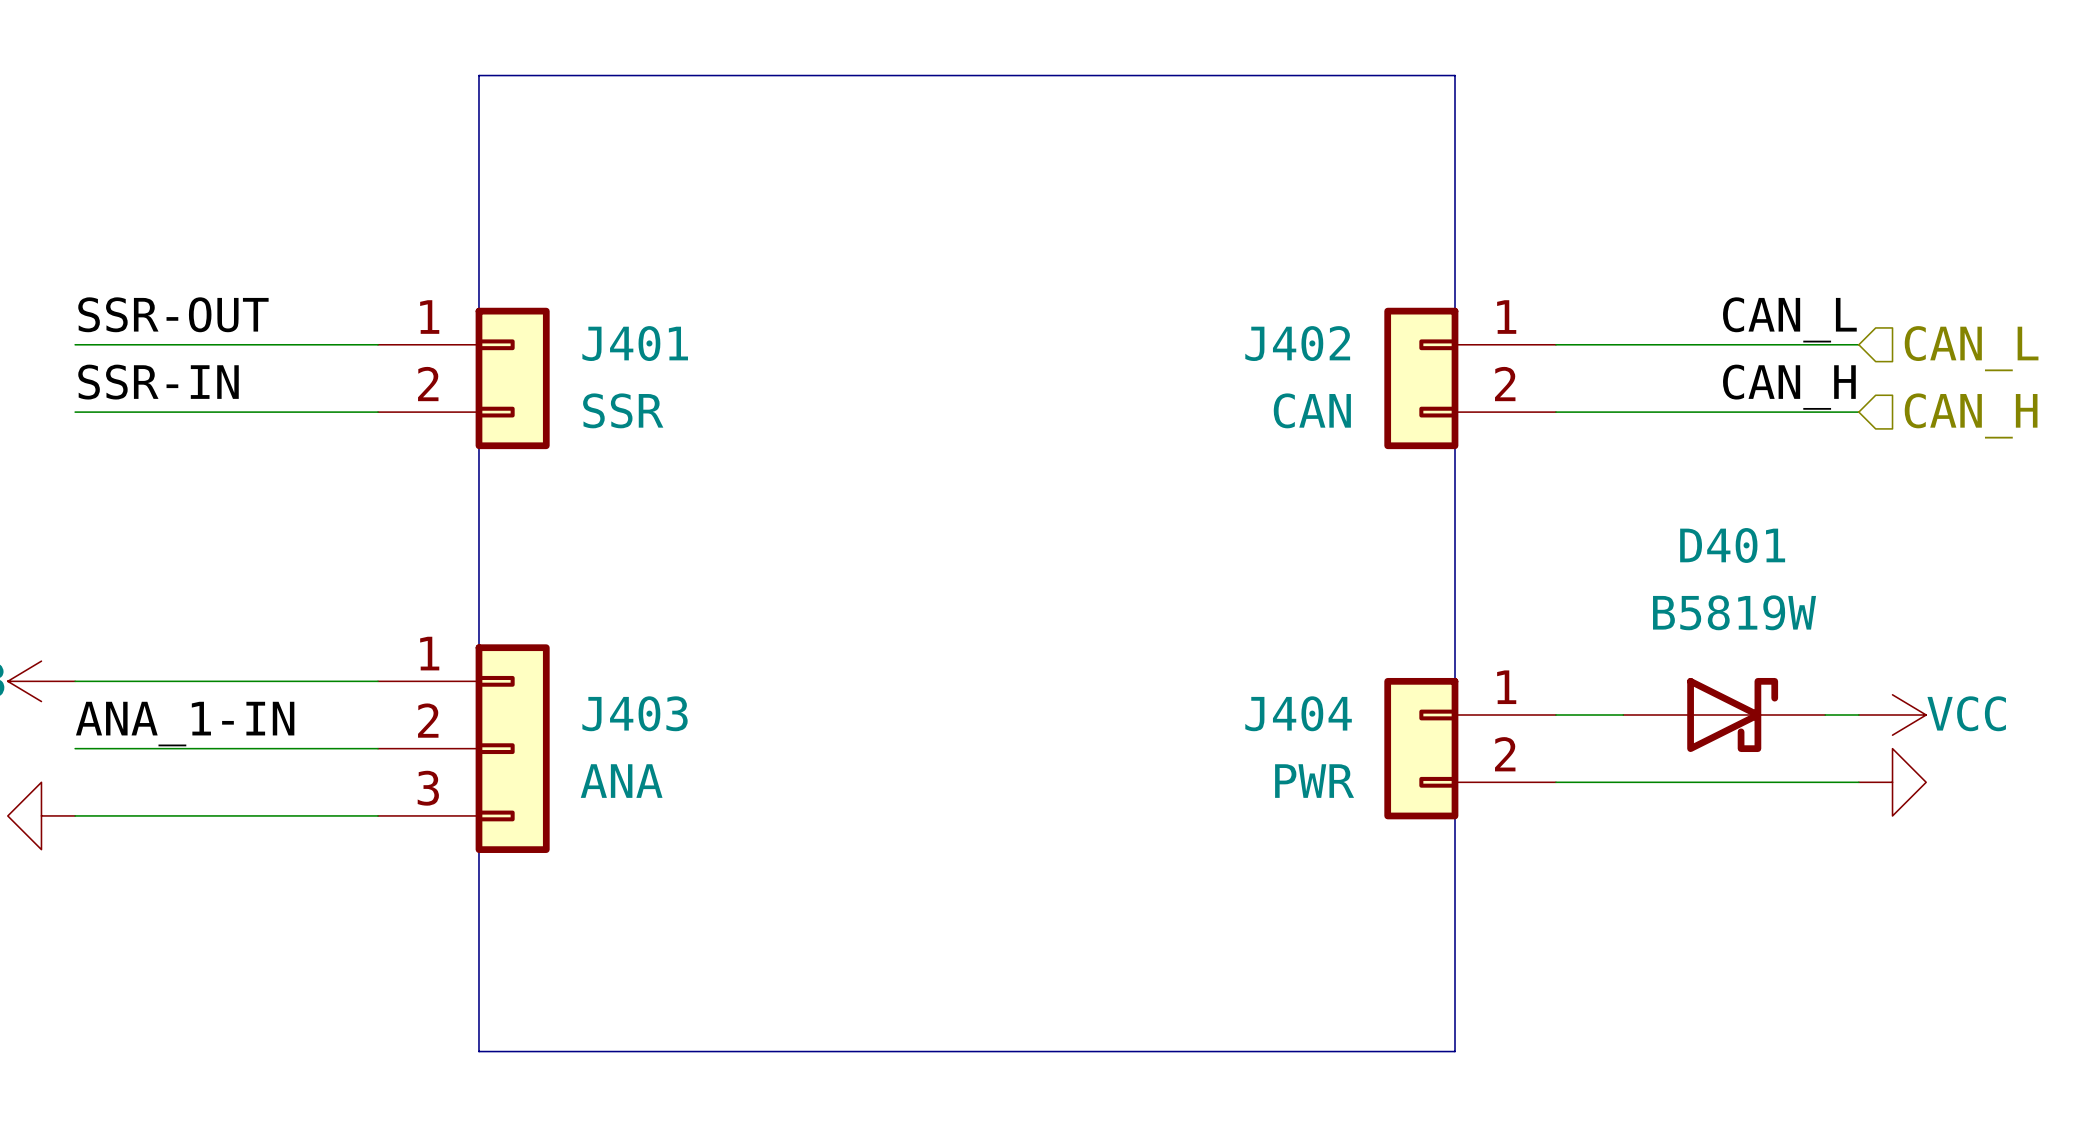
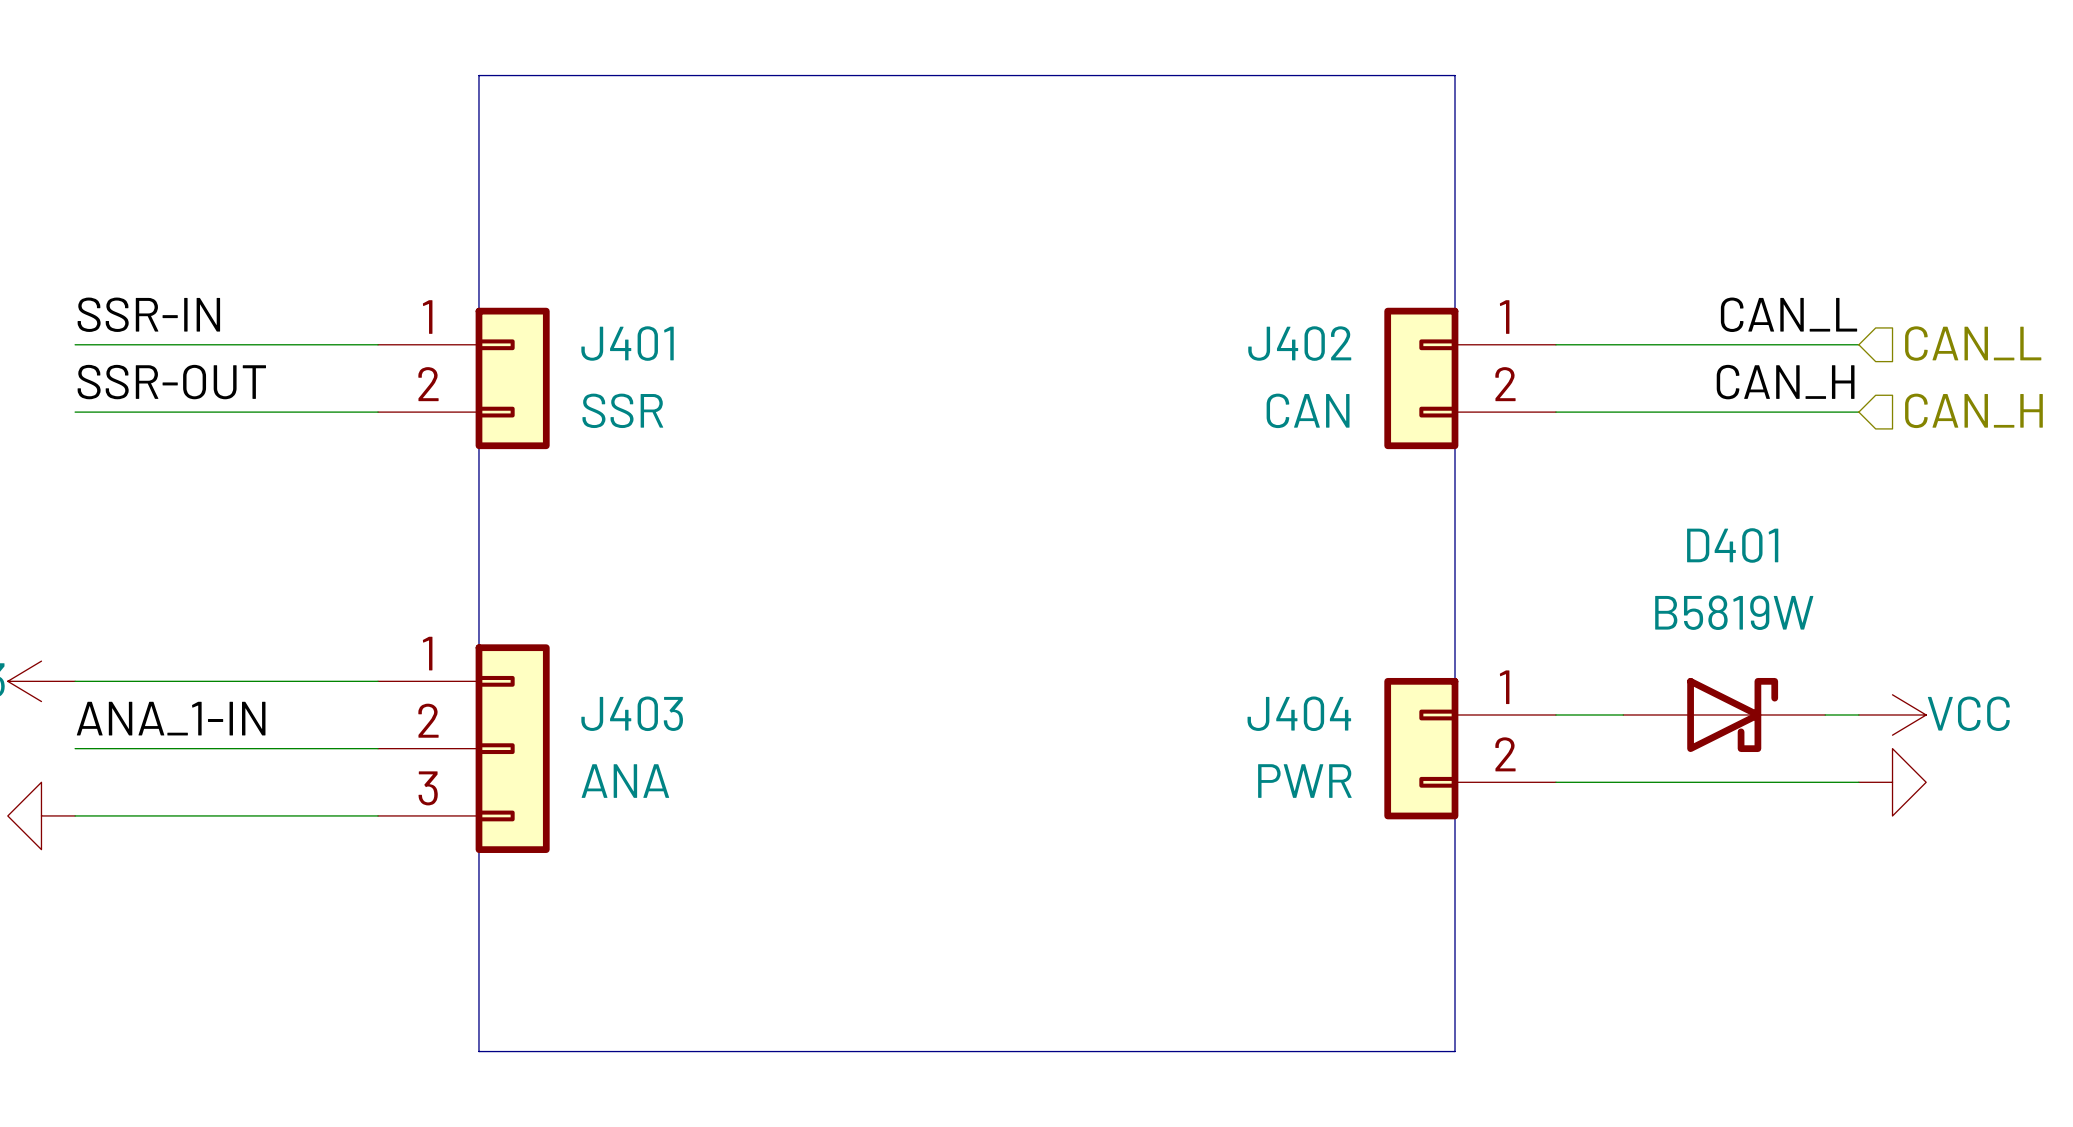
label: SSR-OUT (173, 314) -> SSR-IN (148, 314)
label: SSR-IN (158, 382) -> SSR-OUT (171, 382)

